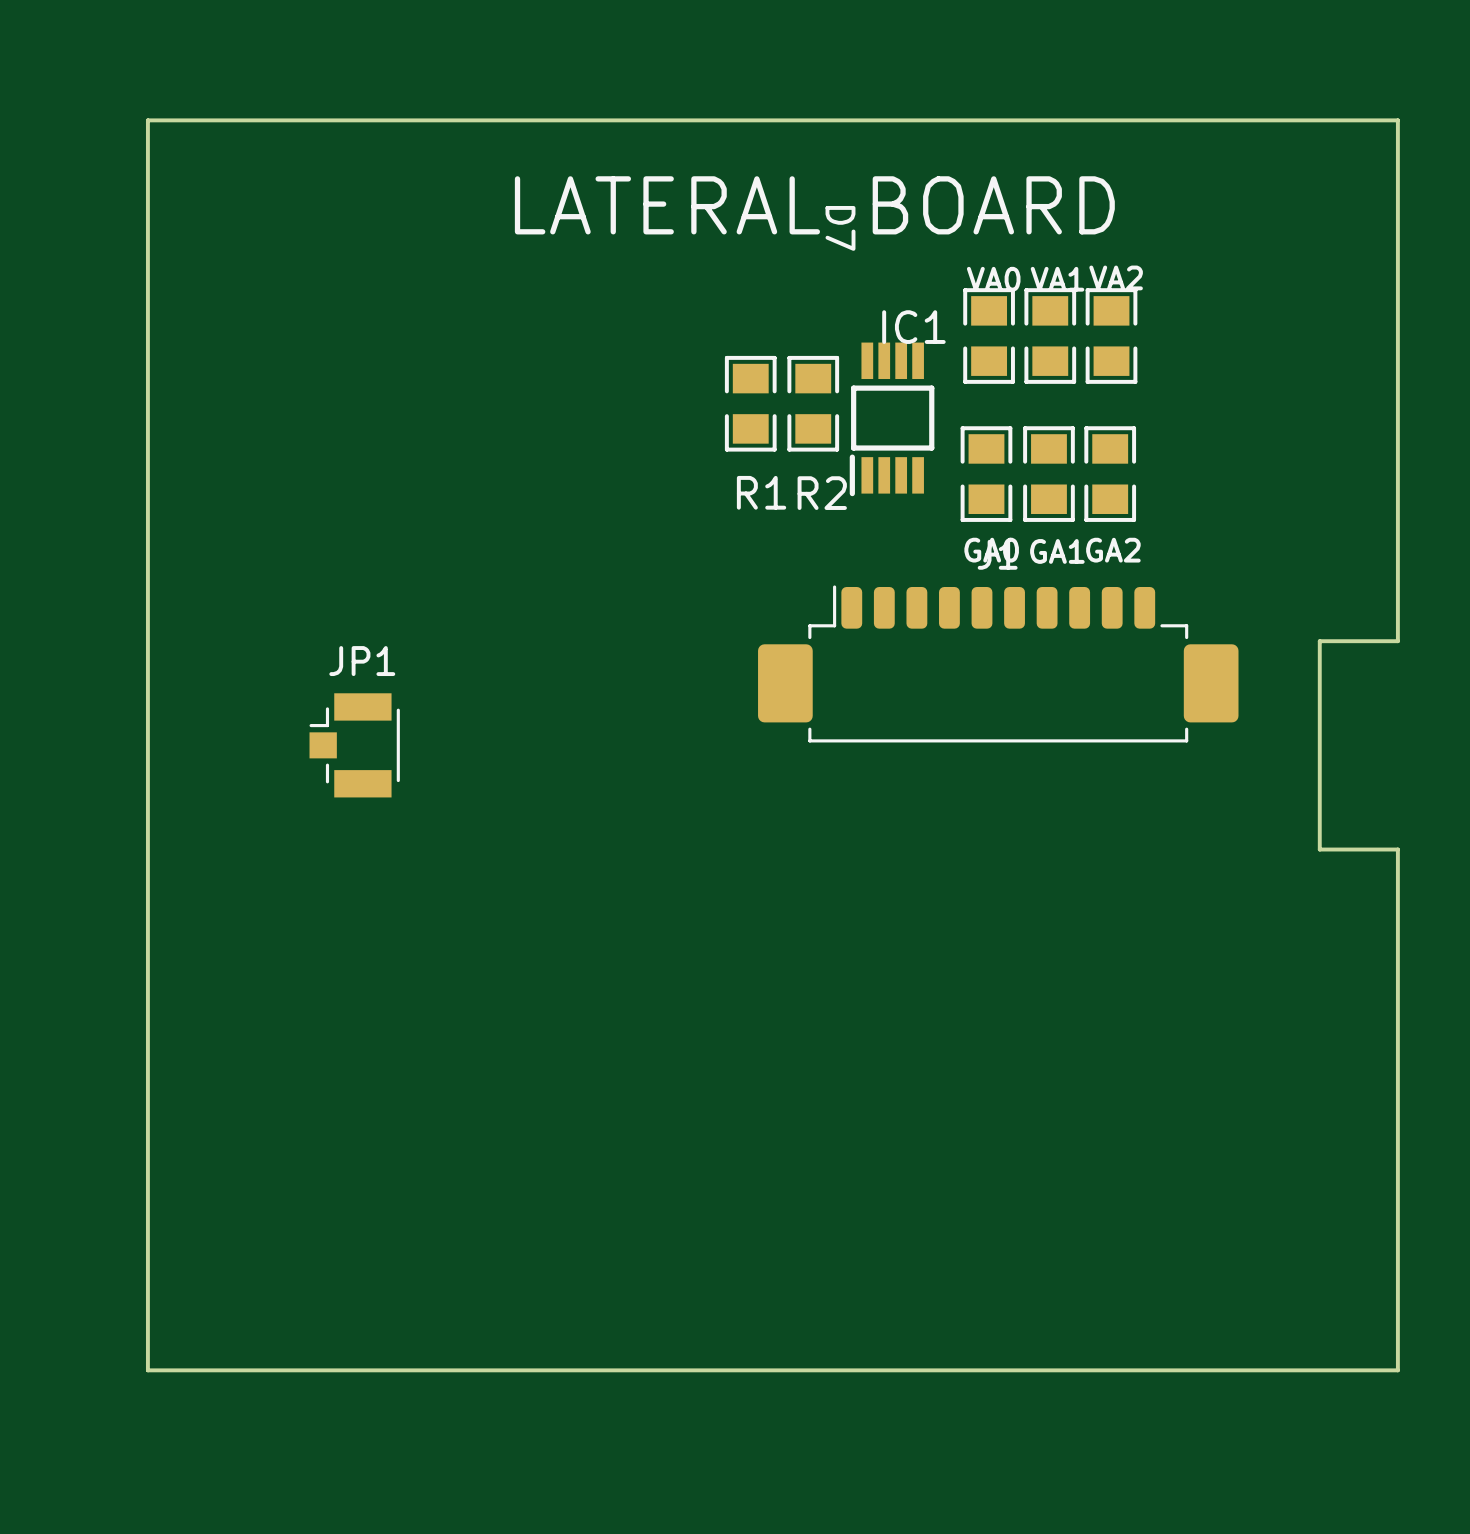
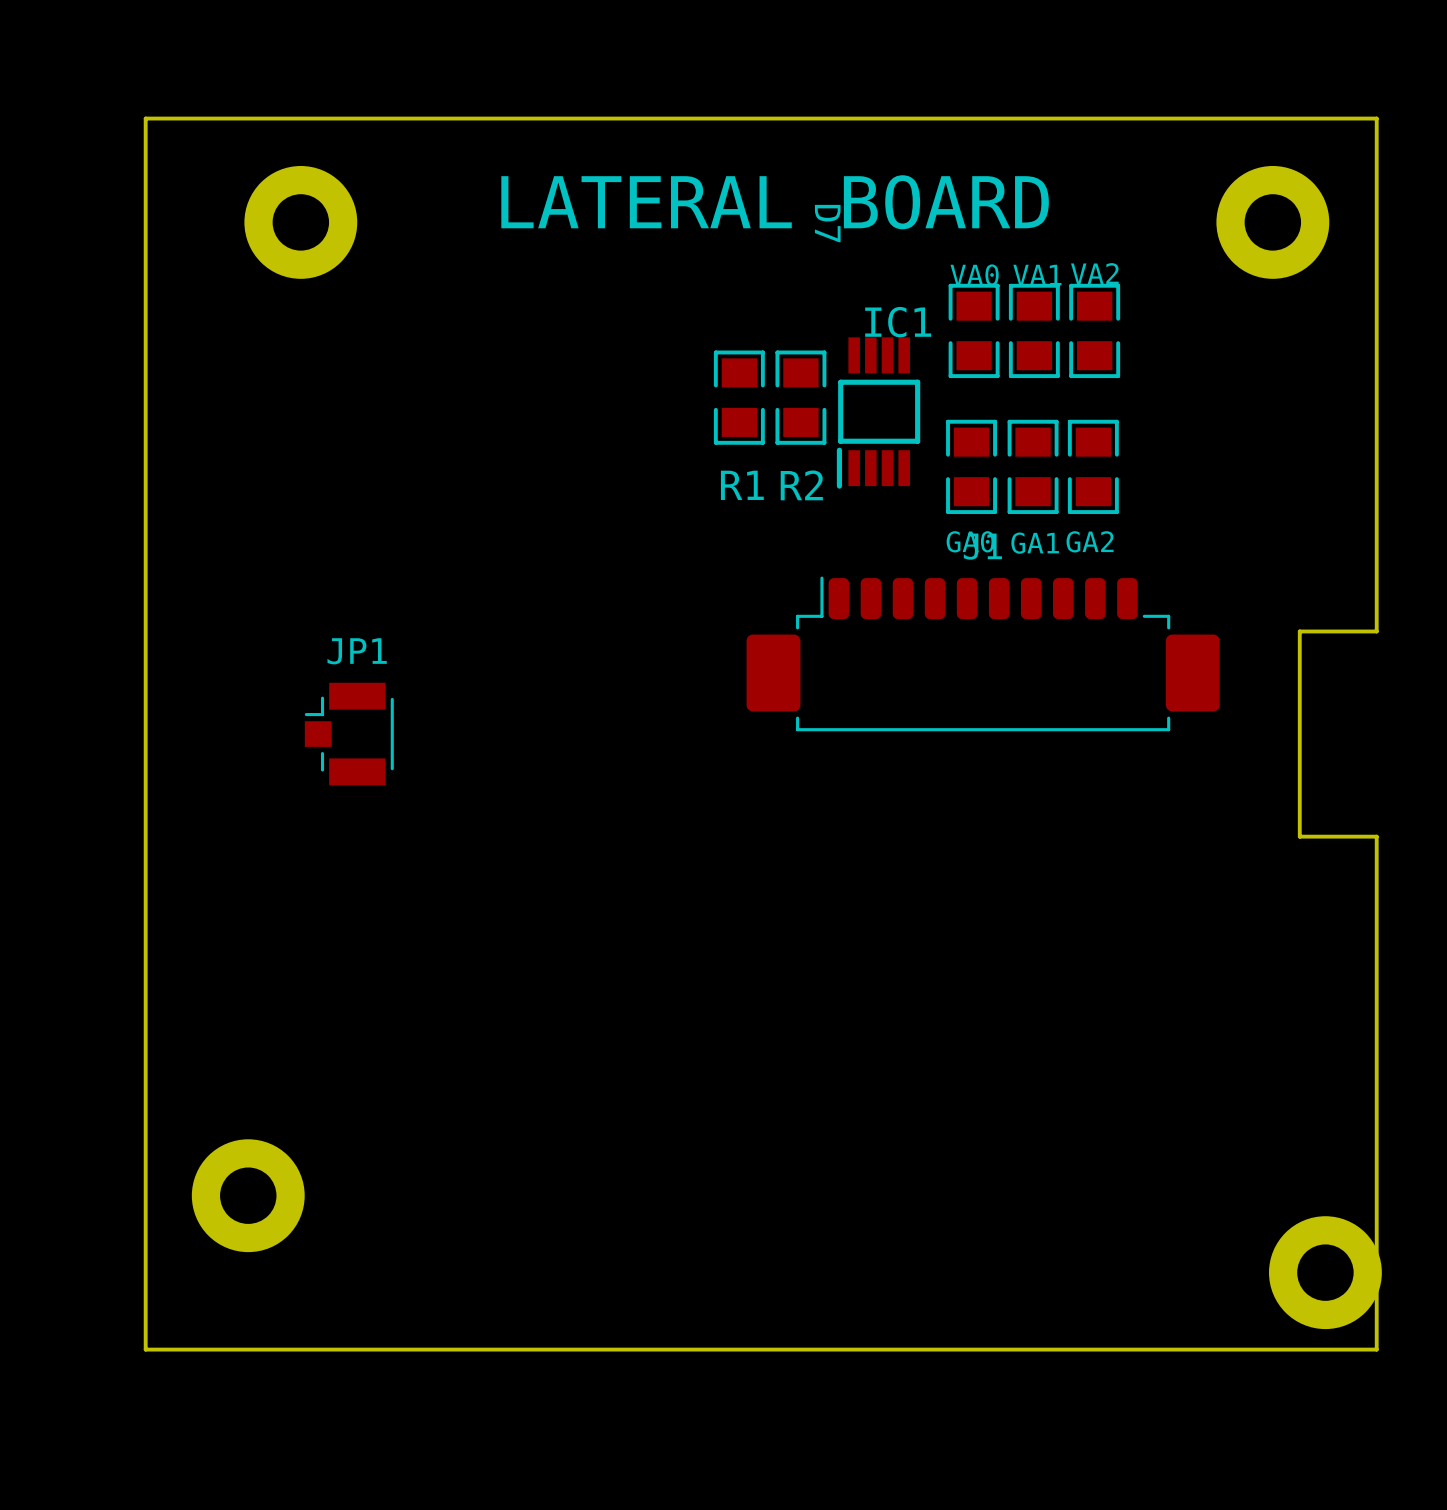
part: none -> (300, 222)
part: none -> (1272, 222)
part: none -> (248, 1195)
part: none -> (1325, 1272)

